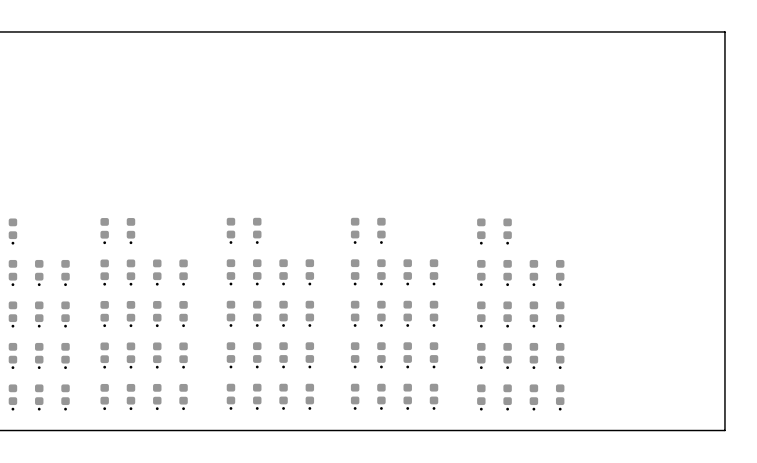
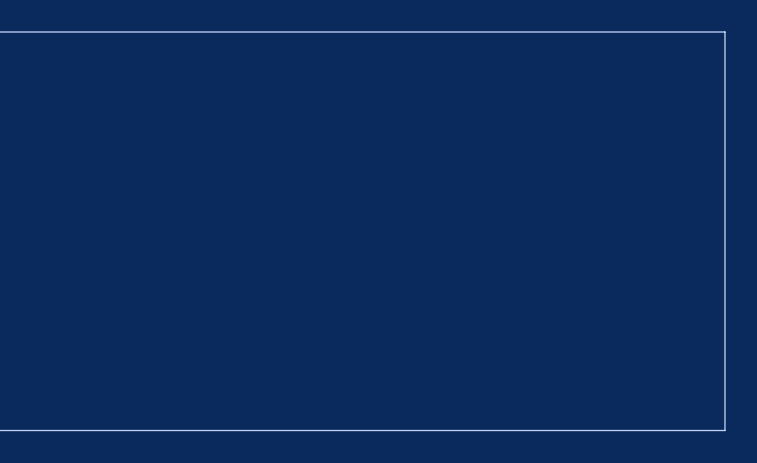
part: (230, 230) -> none
part: (257, 230) -> none
part: (355, 230) -> none
part: (381, 230) -> none
part: (12, 231) -> none
part: (104, 231) -> none
part: (130, 231) -> none
part: (481, 231) -> none
part: (507, 231) -> none
part: (12, 272) -> none
part: (39, 272) -> none
part: (65, 272) -> none
part: (104, 272) -> none
part: (130, 272) -> none
part: (157, 272) -> none
part: (183, 272) -> none
part: (230, 272) -> none
part: (257, 272) -> none
part: (283, 272) -> none
part: (309, 272) -> none
part: (355, 272) -> none
part: (381, 272) -> none
part: (407, 272) -> none
part: (434, 272) -> none
part: (481, 272) -> none
part: (507, 272) -> none
part: (533, 272) -> none
part: (560, 272) -> none
part: (230, 313) -> none
part: (257, 313) -> none
part: (283, 313) -> none
part: (309, 313) -> none
part: (355, 313) -> none
part: (381, 313) -> none
part: (407, 313) -> none
part: (434, 313) -> none
part: (12, 314) -> none
part: (39, 314) -> none
part: (65, 314) -> none
part: (104, 314) -> none
part: (130, 314) -> none
part: (157, 314) -> none
part: (183, 314) -> none
part: (481, 314) -> none
part: (507, 314) -> none
part: (533, 314) -> none
part: (560, 314) -> none
part: (12, 355) -> none
part: (39, 355) -> none
part: (65, 355) -> none
part: (104, 355) -> none
part: (130, 355) -> none
part: (157, 355) -> none
part: (183, 355) -> none
part: (230, 355) -> none
part: (257, 355) -> none
part: (283, 355) -> none
part: (309, 355) -> none
part: (355, 355) -> none
part: (381, 355) -> none
part: (407, 355) -> none
part: (434, 355) -> none
part: (481, 355) -> none
part: (507, 355) -> none
part: (533, 355) -> none
part: (560, 355) -> none
part: (104, 396) -> none
part: (130, 396) -> none
part: (157, 396) -> none
part: (183, 396) -> none
part: (230, 396) -> none
part: (257, 396) -> none
part: (283, 396) -> none
part: (309, 396) -> none
part: (355, 396) -> none
part: (381, 396) -> none
part: (407, 396) -> none
part: (434, 396) -> none
part: (12, 397) -> none
part: (39, 397) -> none
part: (65, 397) -> none
part: (481, 397) -> none
part: (507, 397) -> none
part: (533, 397) -> none
part: (560, 397) -> none

